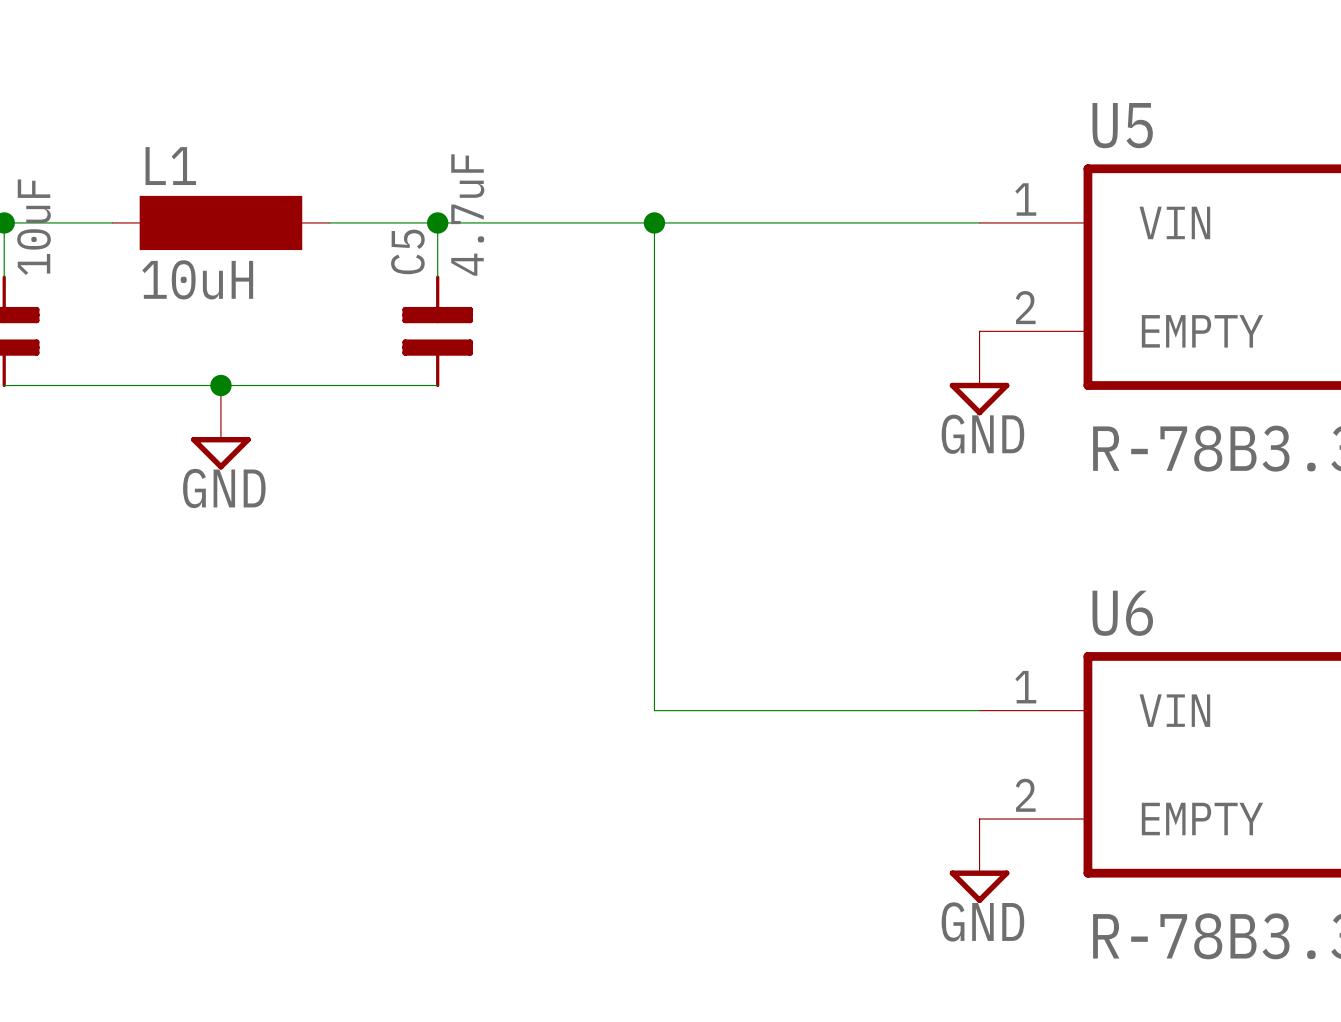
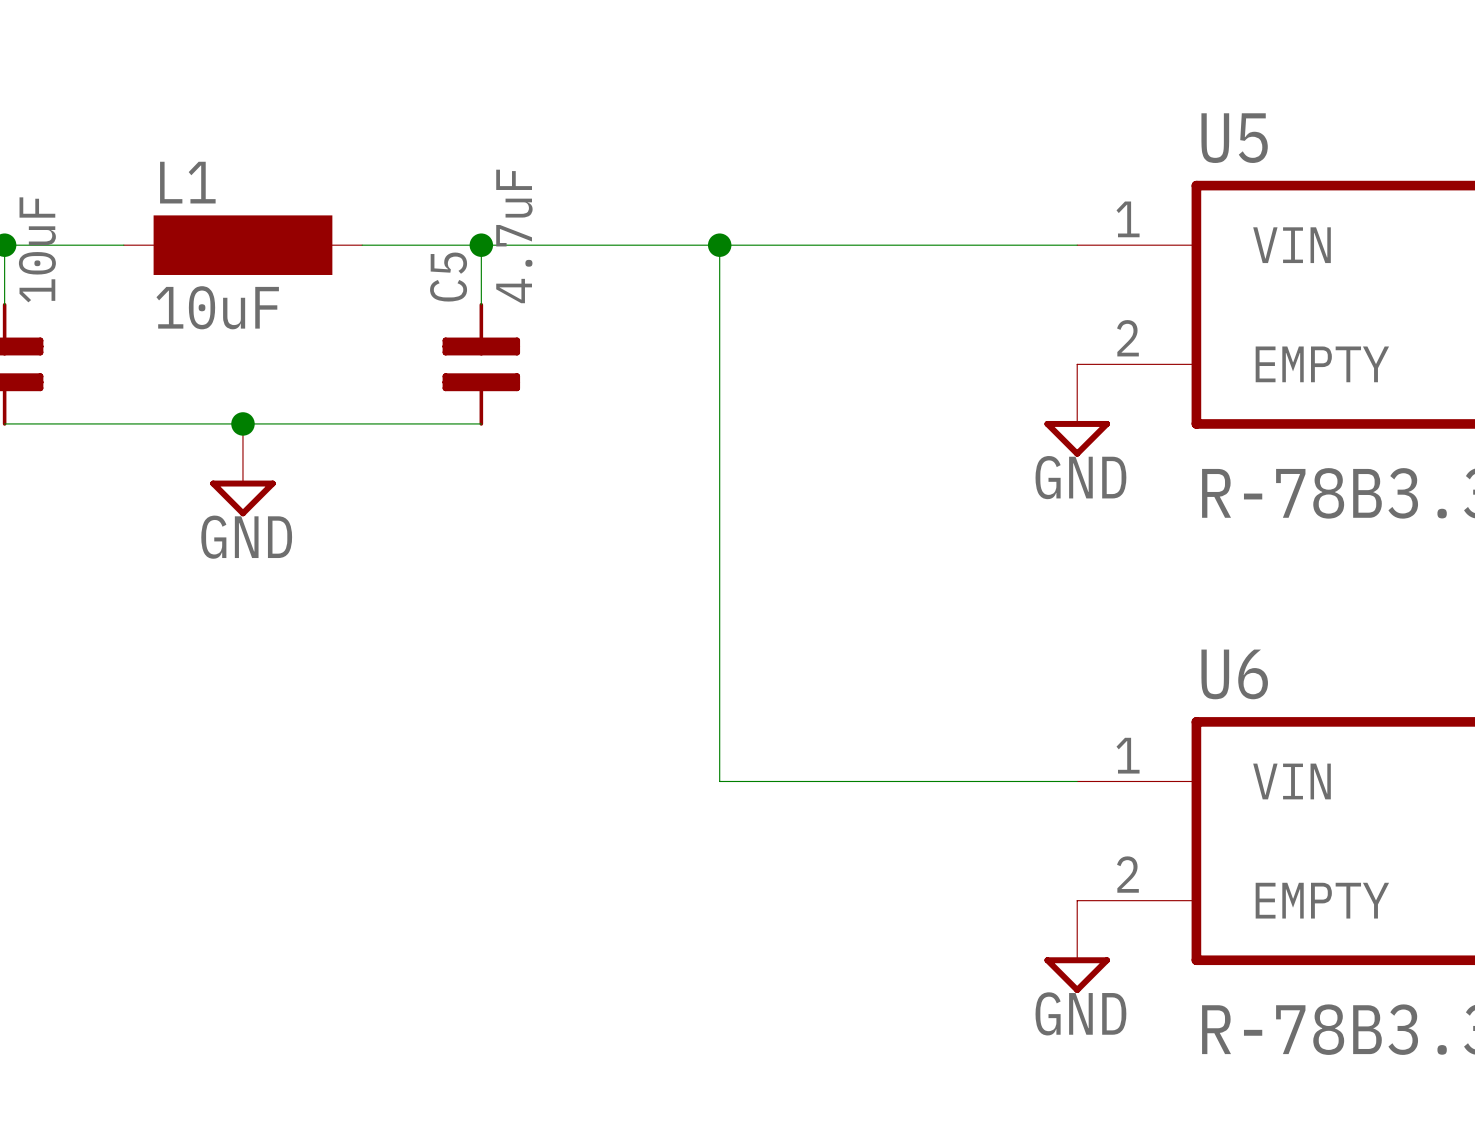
L1 value: 10uH (197, 279) -> 10uF (217, 307)

